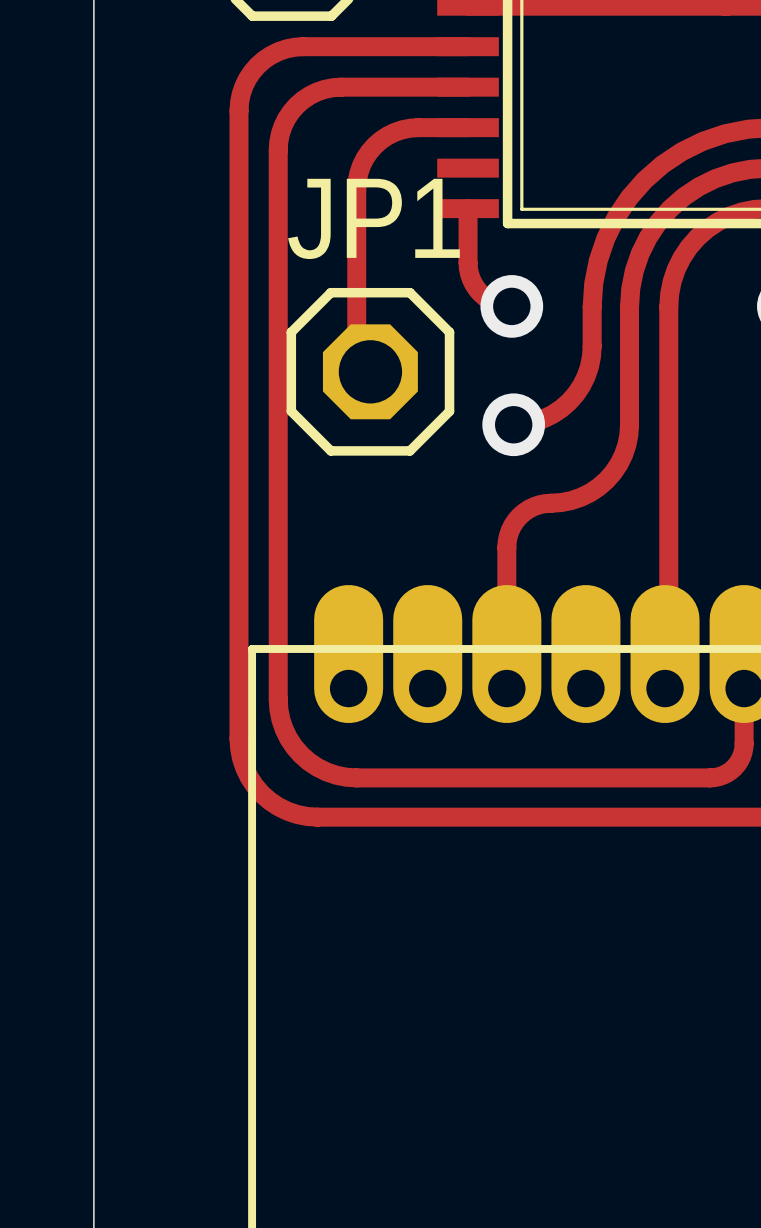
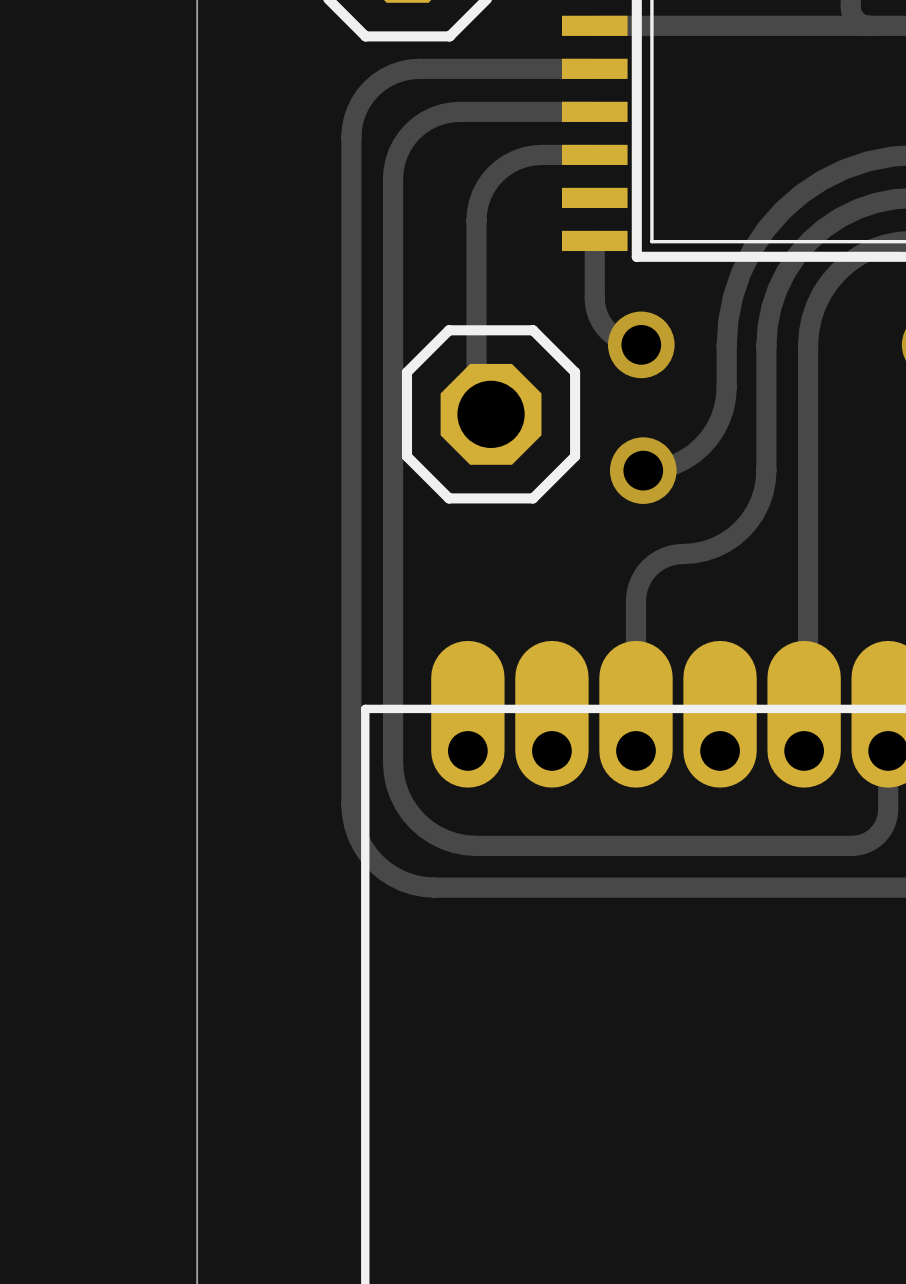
JP1 name: JP1 (374, 218) -> none

